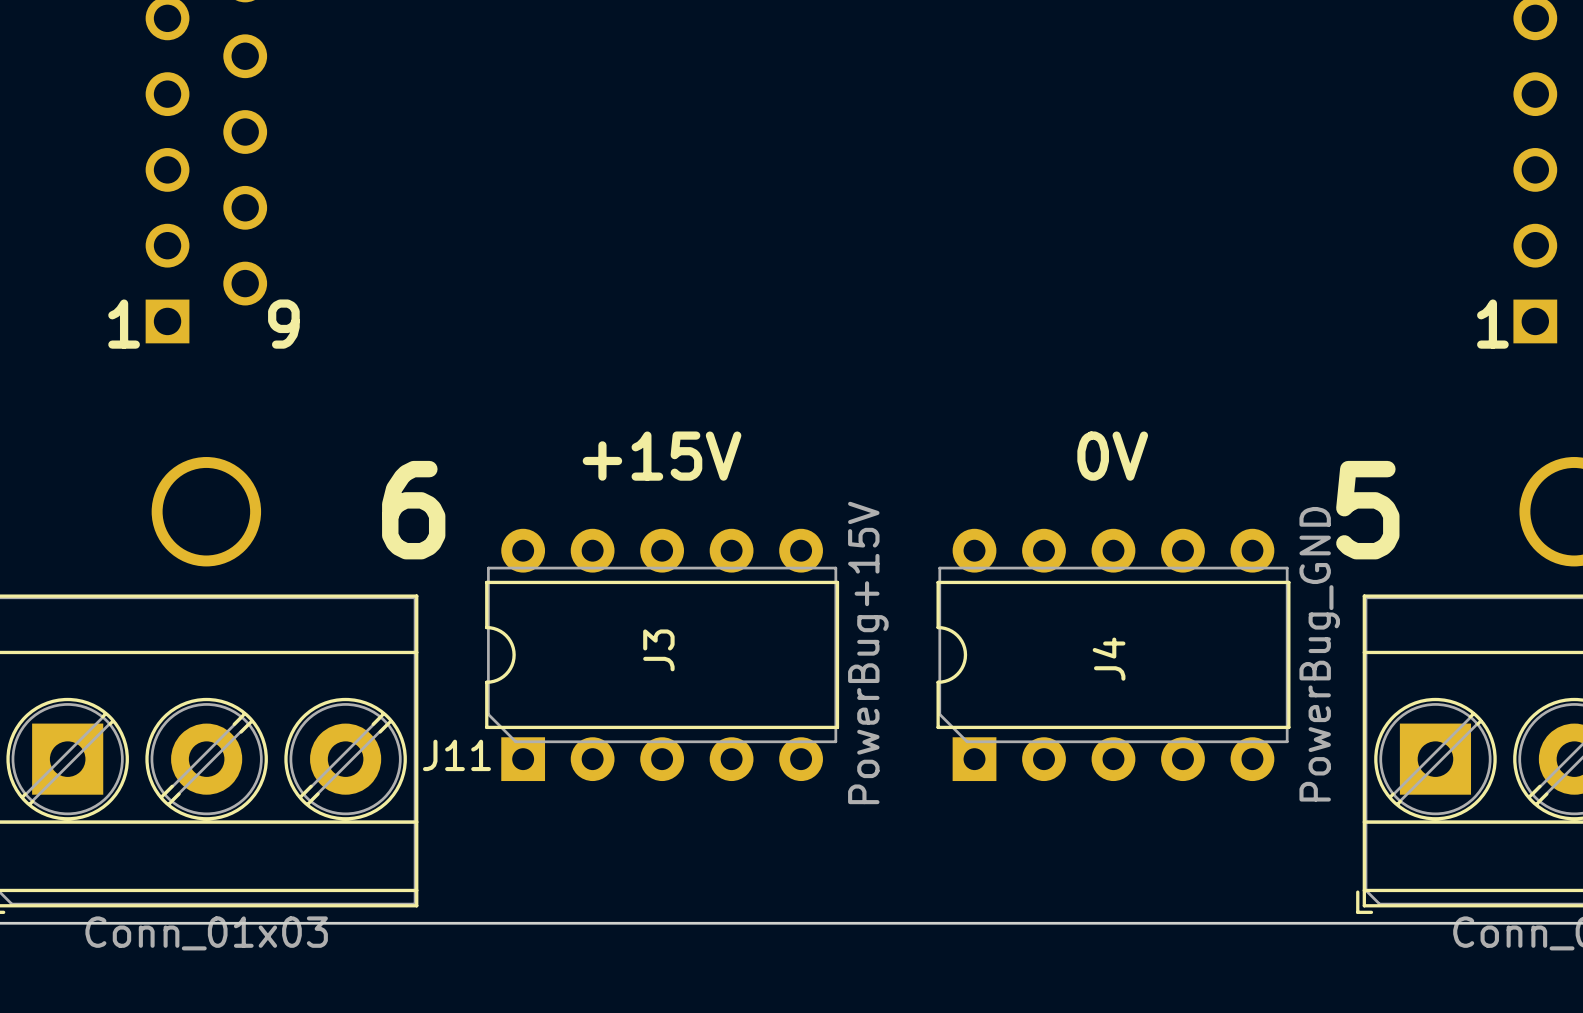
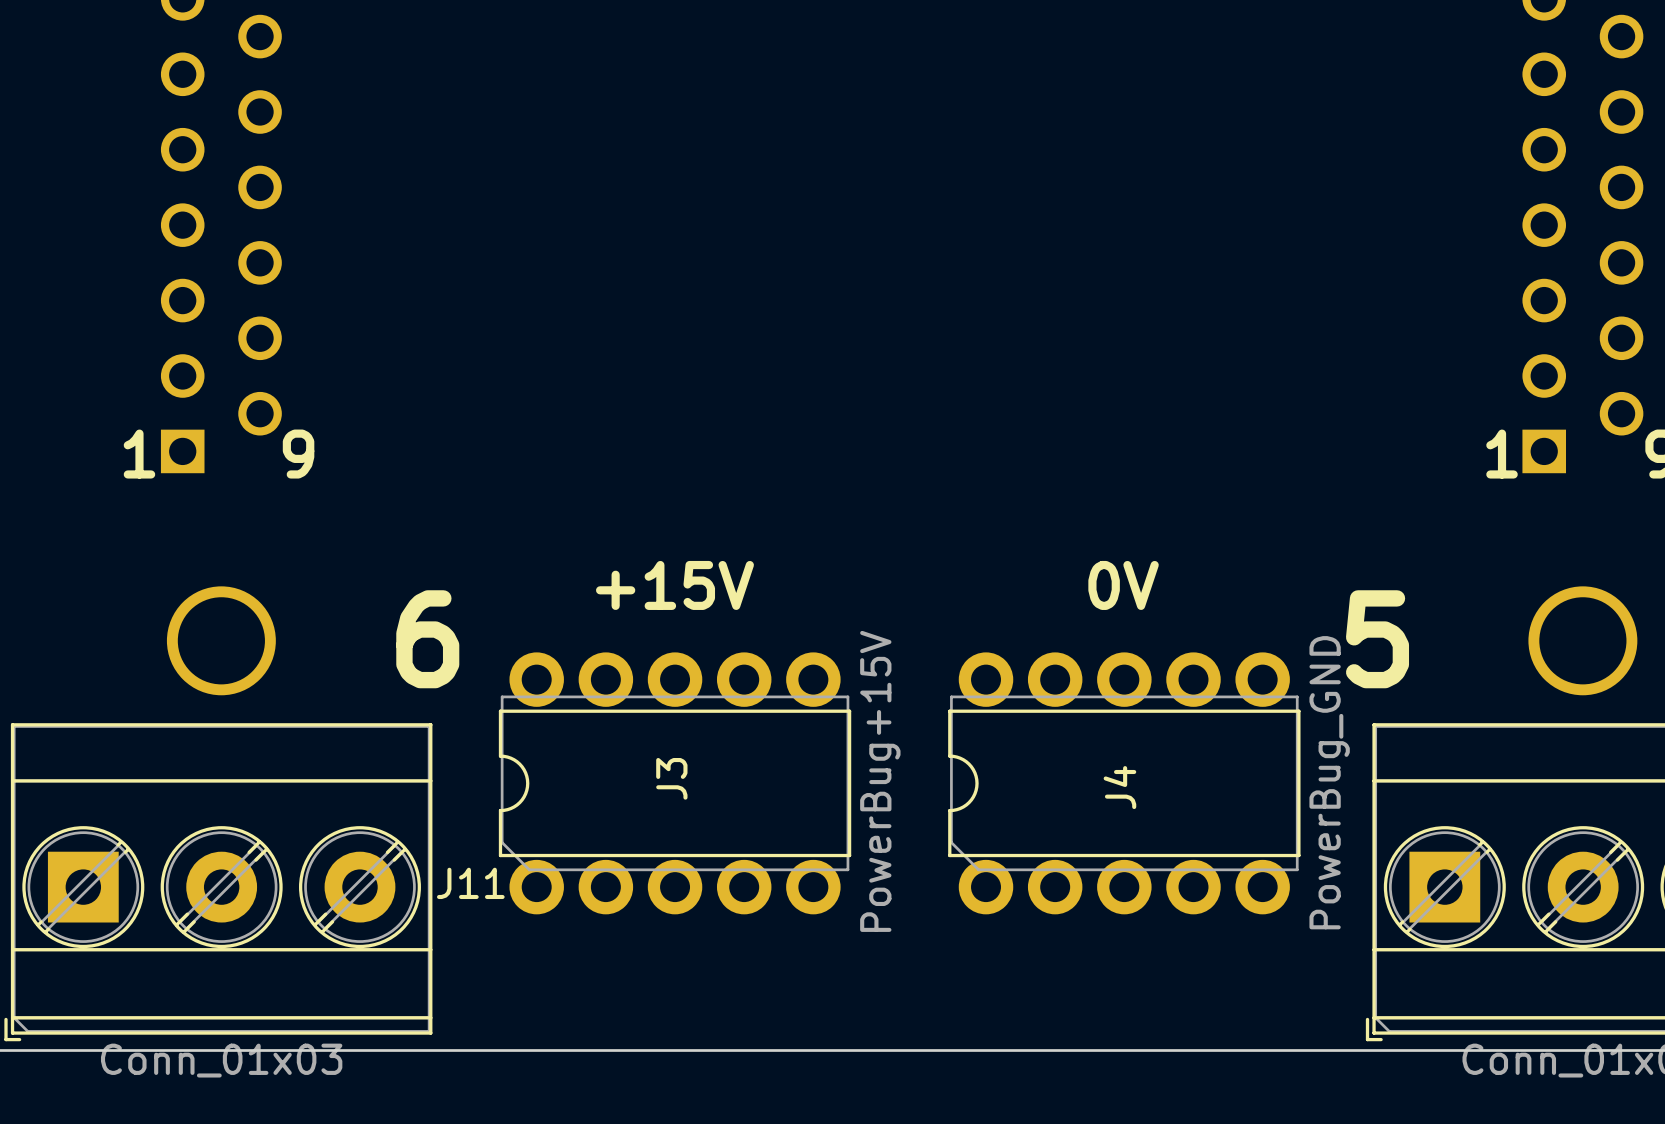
J3 footprint: [485, 528, 840, 782] -> [498, 652, 852, 915]
J4 footprint: [936, 528, 1291, 782] -> [948, 652, 1301, 915]

